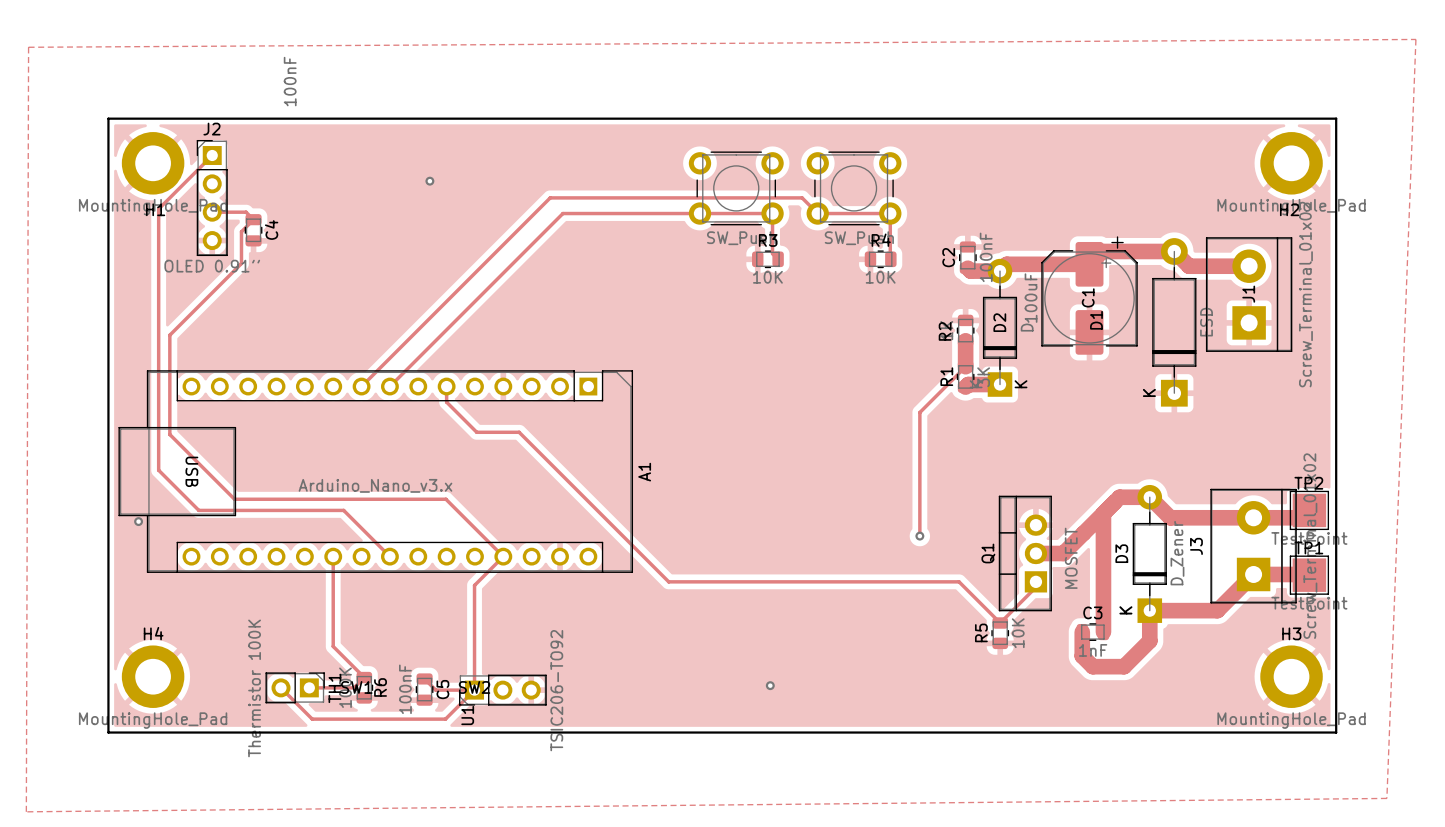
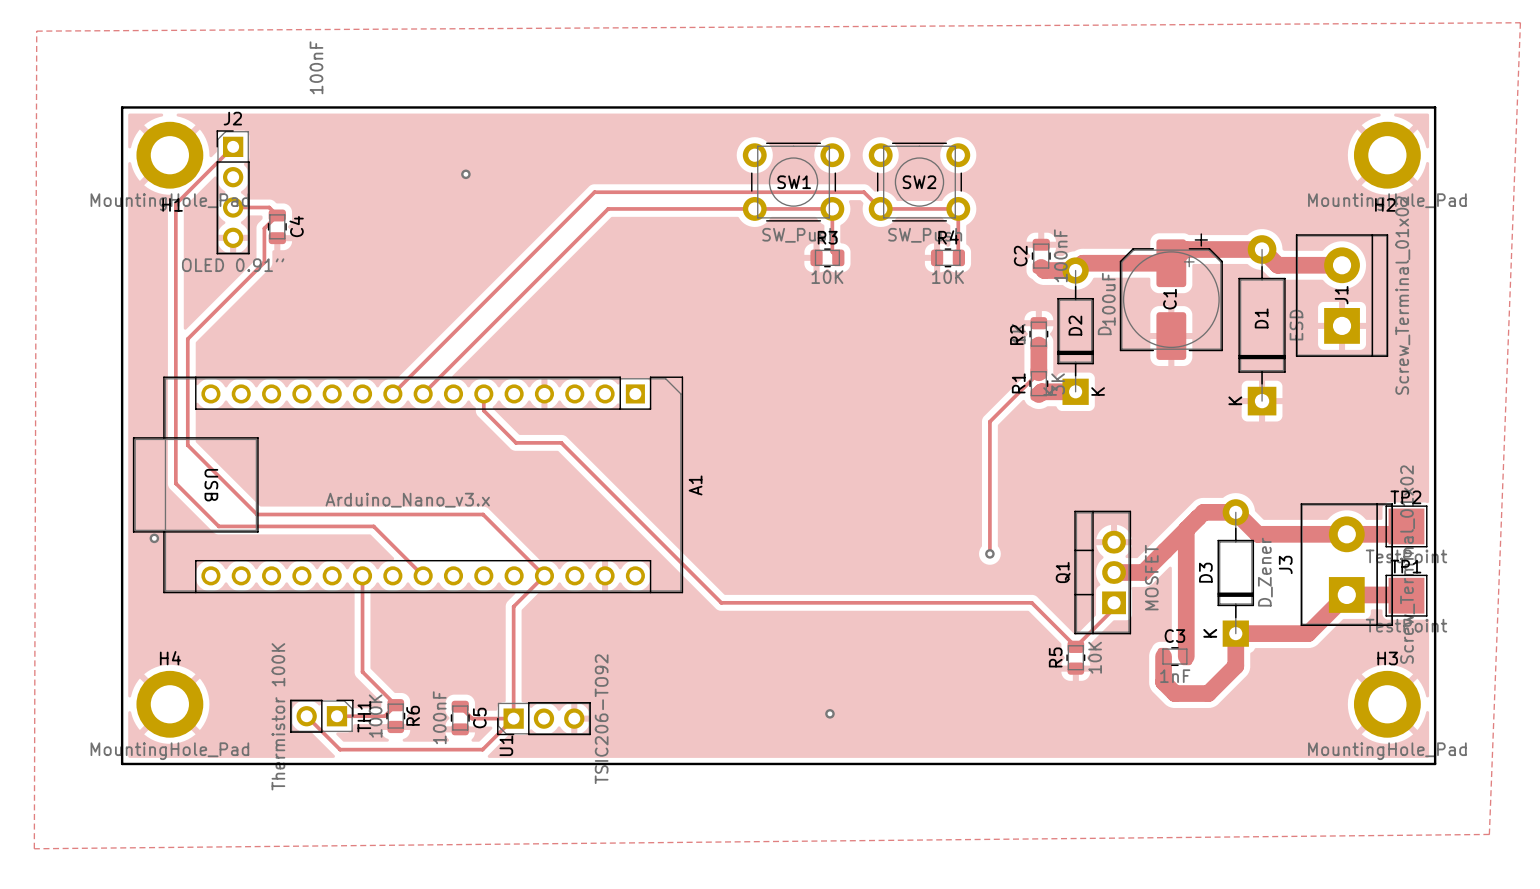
D1 name position: D1 (1096, 320) -> D1 (1261, 318)
SW1 name position: SW1 (356, 687) -> SW1 (794, 182)
SW2 name position: SW2 (474, 687) -> SW2 (919, 182)

